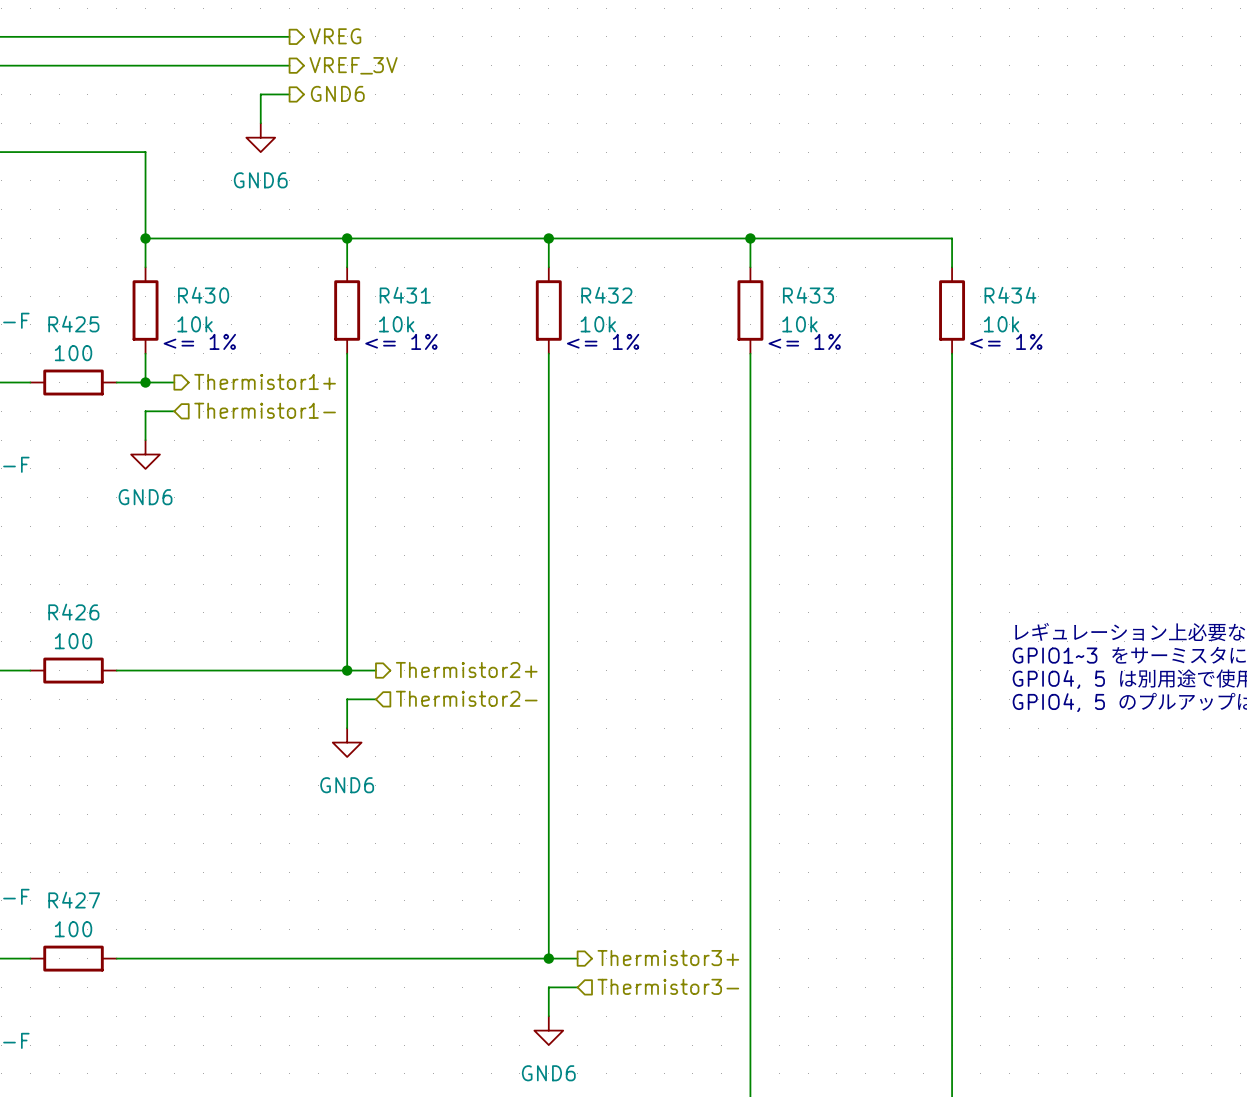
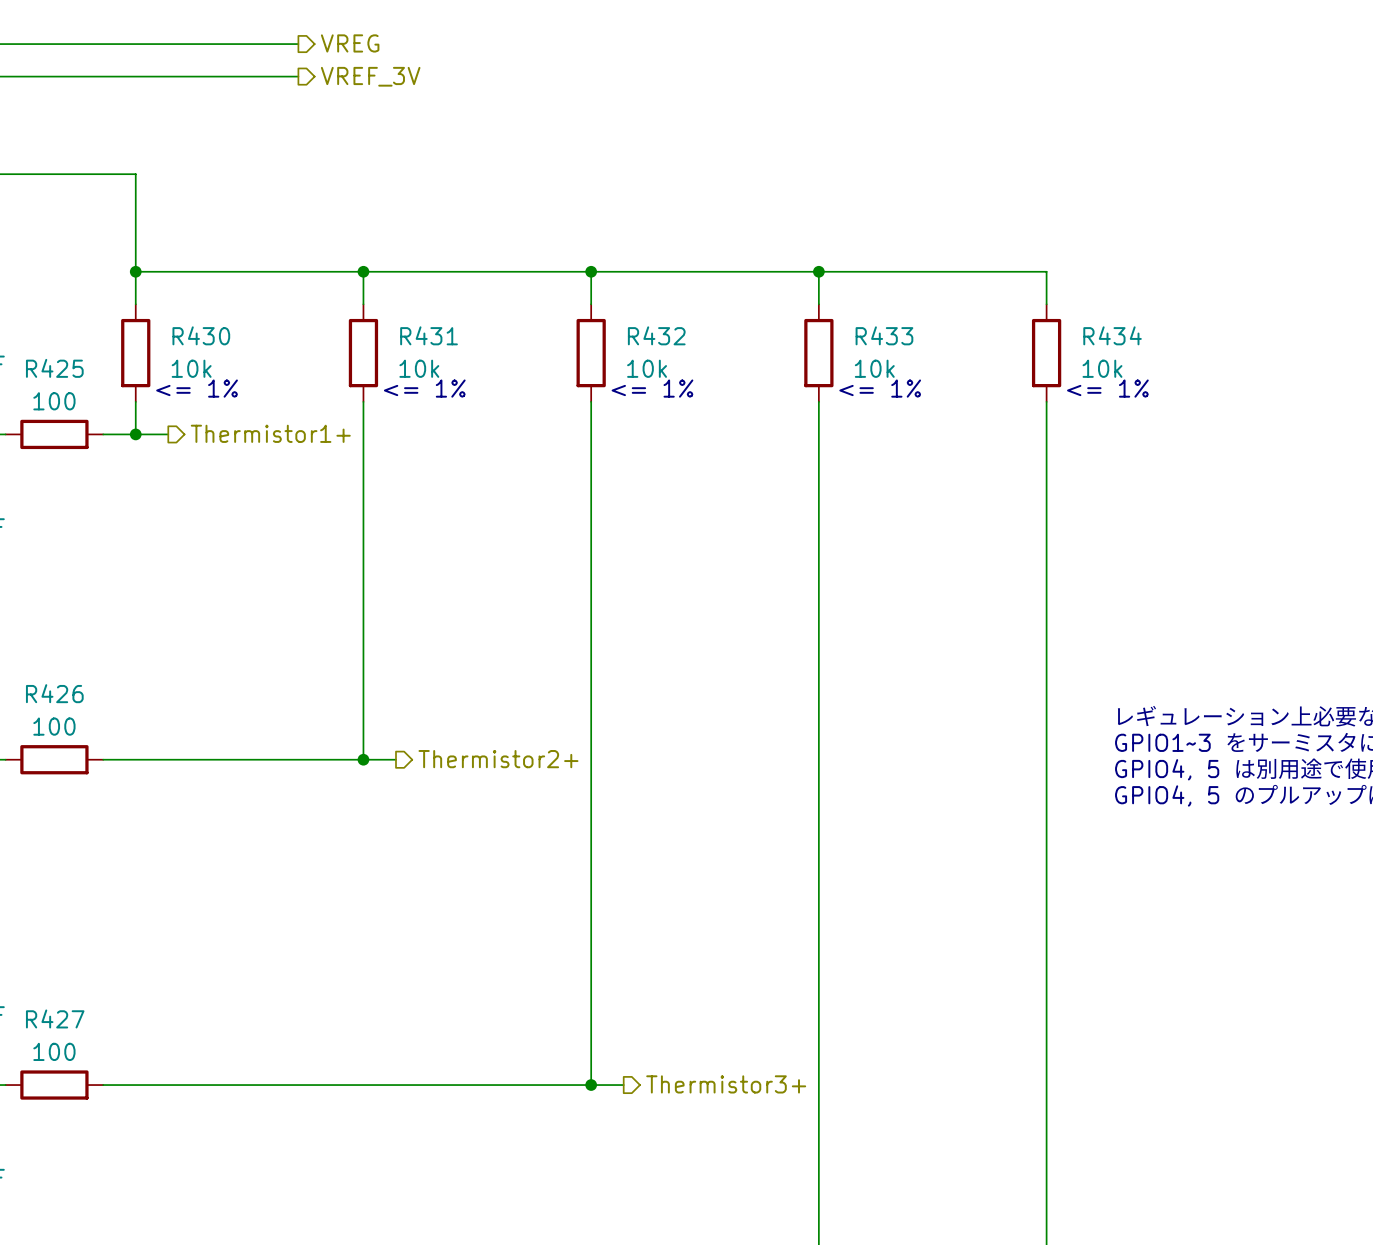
hierarchical label: GND6 (337, 93) -> none
wire: (289, 94) (260, 94) (260, 123) -> none
power symbol: GND6 (260, 137) -> none
hierarchical label: Thermistor1- (265, 410) -> none
wire: (174, 411) (145, 411) (145, 440) -> none
power symbol: GND6 (145, 454) -> none
hierarchical label: Thermistor2- (466, 698) -> none
wire: (375, 699) (347, 699) (347, 728) -> none
power symbol: GND6 (347, 742) -> none
hierarchical label: Thermistor3- (668, 986) -> none
wire: (577, 987) (548, 987) (548, 1016) -> none
power symbol: GND6 (548, 1030) -> none

